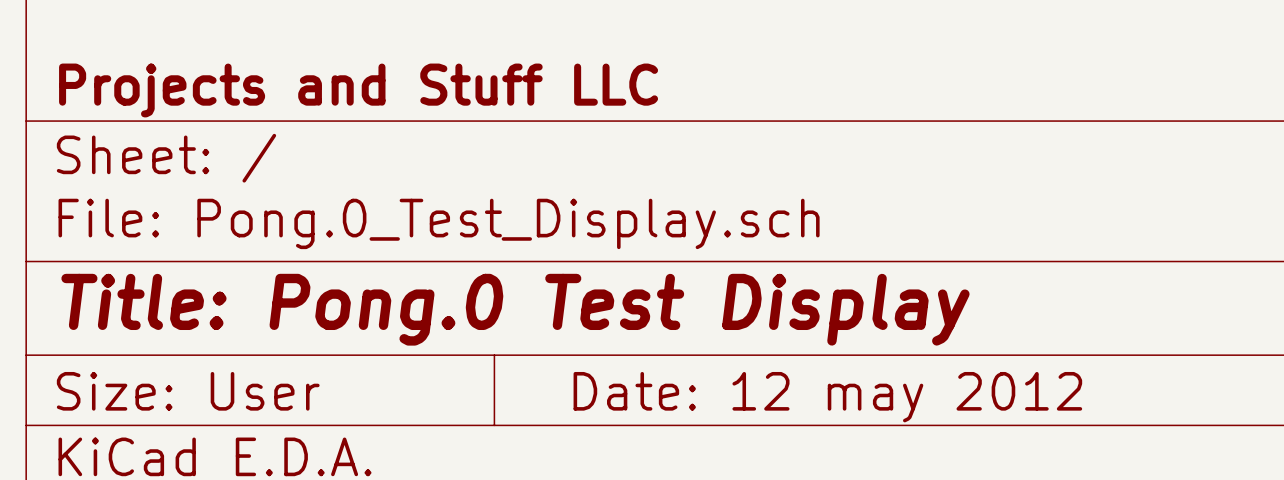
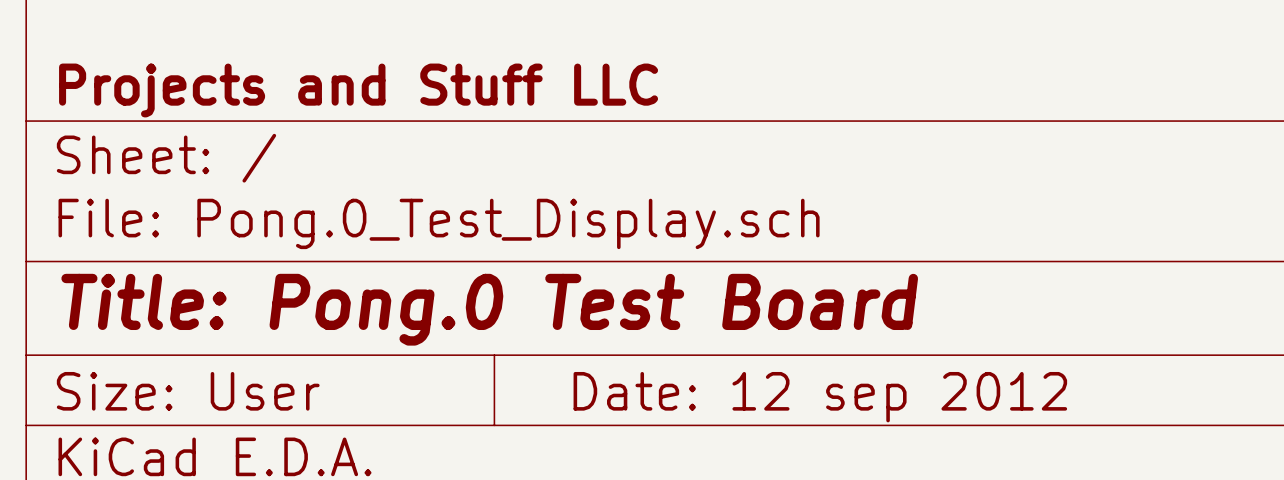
title block: Title: Pong.0 Test Display (515, 309) -> Title: Pong.0 Test Board (489, 309)
title block: Date: 12 may 2012 (827, 397) -> Date: 12 sep 2012 (820, 397)

